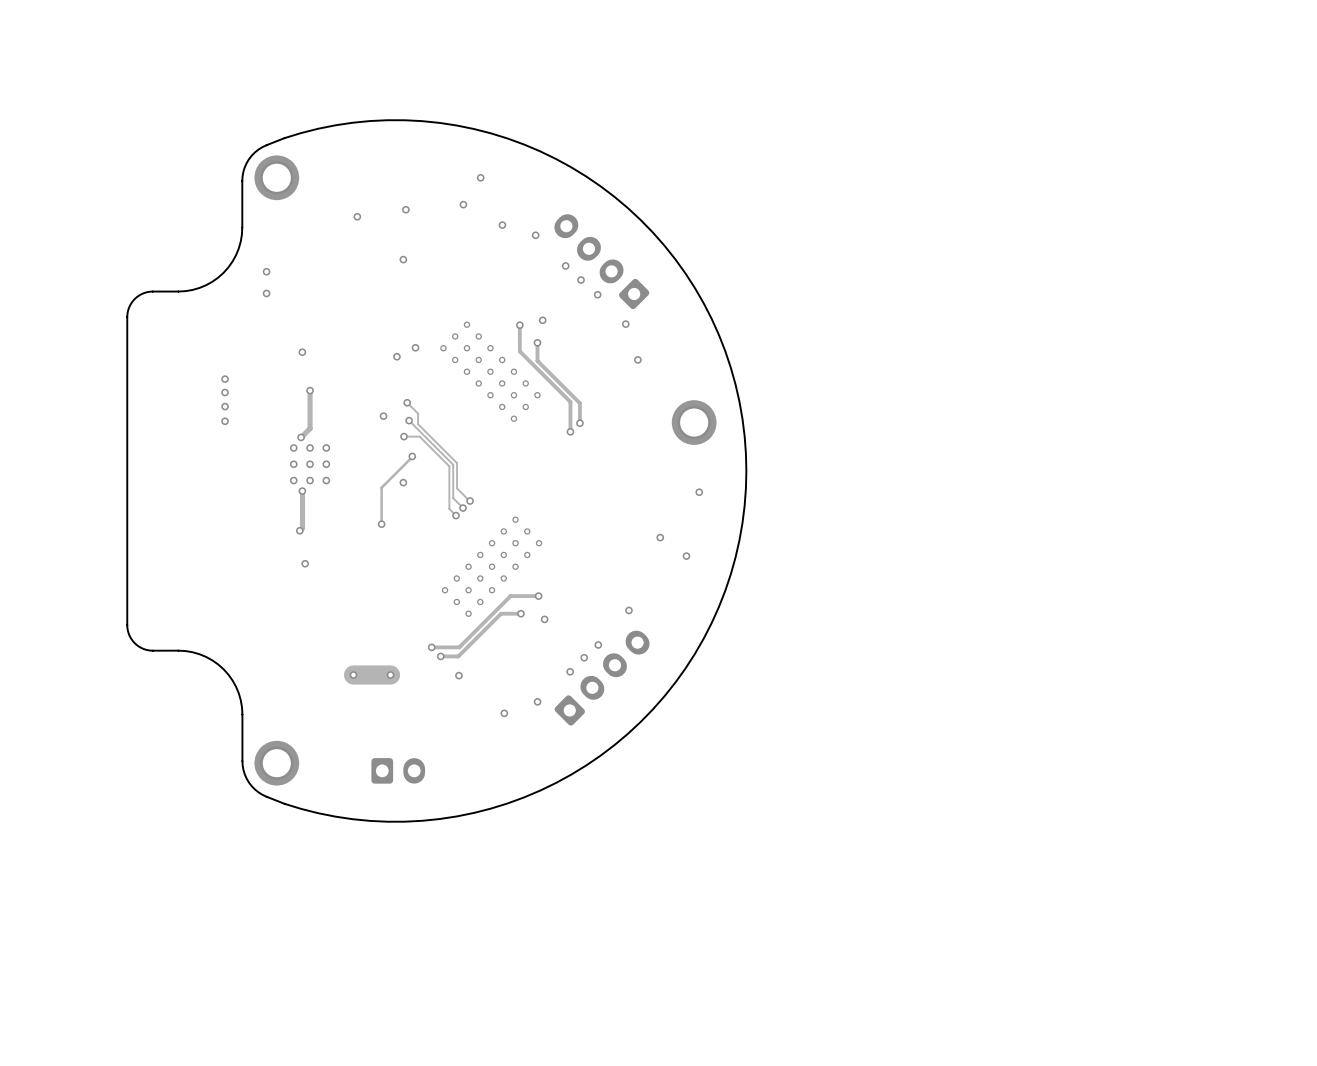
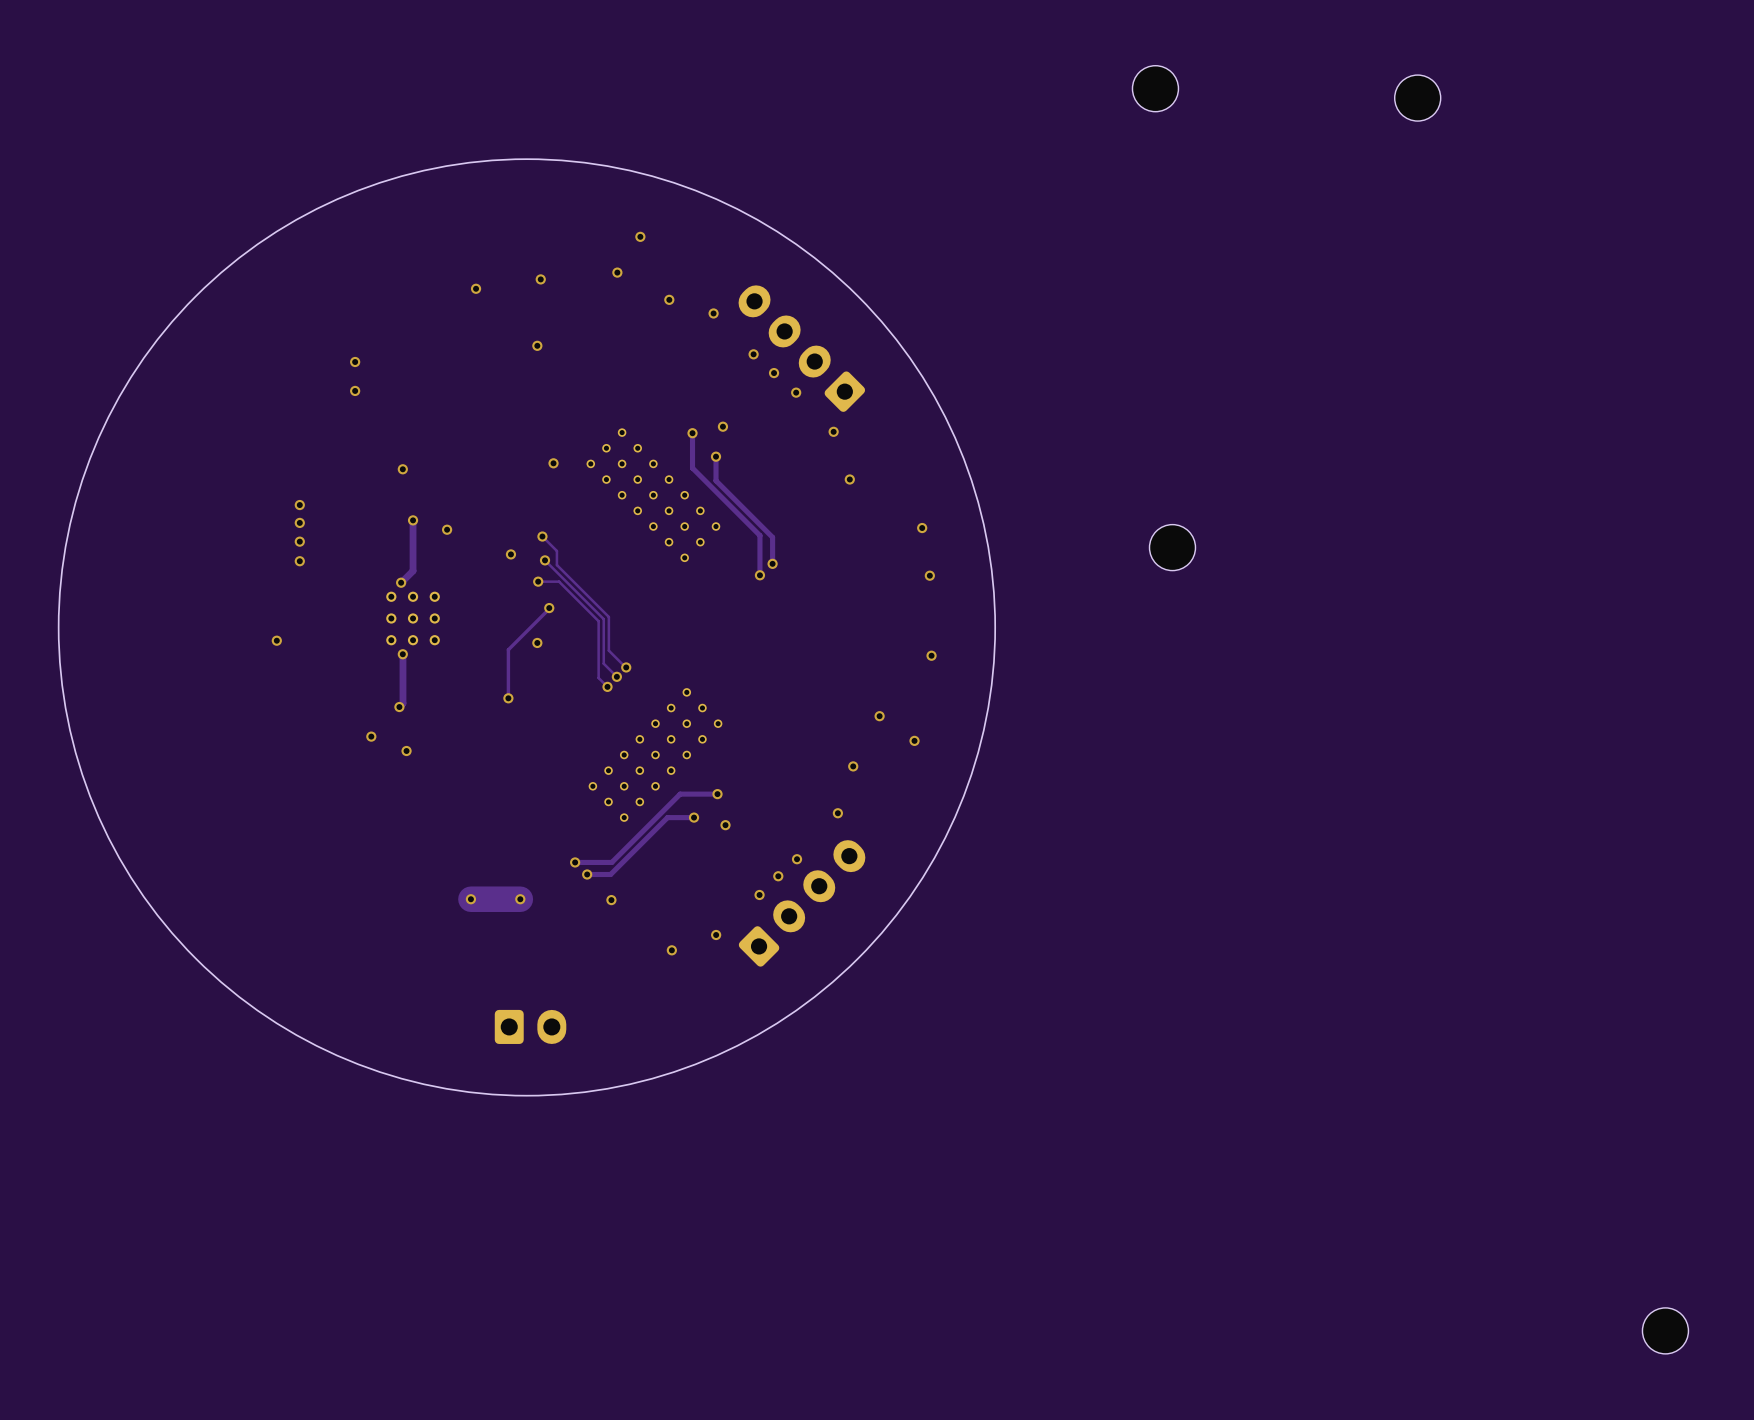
part: none -> (1155, 88)
part: none -> (1417, 98)
round board edge: none -> [57, 158, 997, 1097]
board edge: (284, 138) (258, 149) (246, 163) (242, 176) (240, 241) (232, 261) (223, 272) (212, 281) (192, 289) (144, 292) (134, 299) (128, 308) (128, 633) (134, 643) (144, 649) (185, 651) (199, 654) (218, 664) (228, 674) (236, 686) (242, 707) (242, 761) (244, 774) (251, 786) (266, 796) (318, 813) (352, 819) (387, 821) (422, 820) (457, 816) (507, 803) (540, 790) (571, 774) (600, 755) (627, 733) (652, 709) (675, 682) (695, 653) (711, 622) (725, 590) (735, 557) (744, 505) (746, 470) (744, 436) (739, 401) (730, 367) (718, 334) (703, 303) (685, 273) (664, 245) (640, 220) (614, 196) (586, 176) (555, 158) (524, 144) (491, 133) (456, 125) (422, 121) (387, 120) (352, 122) (318, 128) (284, 138) -> none
part: (276, 177) -> none
via position: (396, 356) -> (447, 529)
via: none -> (922, 528)
part: none -> (1172, 547)
part: (694, 422) -> none
via: none -> (929, 575)
via: none -> (276, 640)
via: none -> (371, 736)
via: none -> (853, 766)
part: (276, 763) -> none
part: none -> (1665, 1330)

